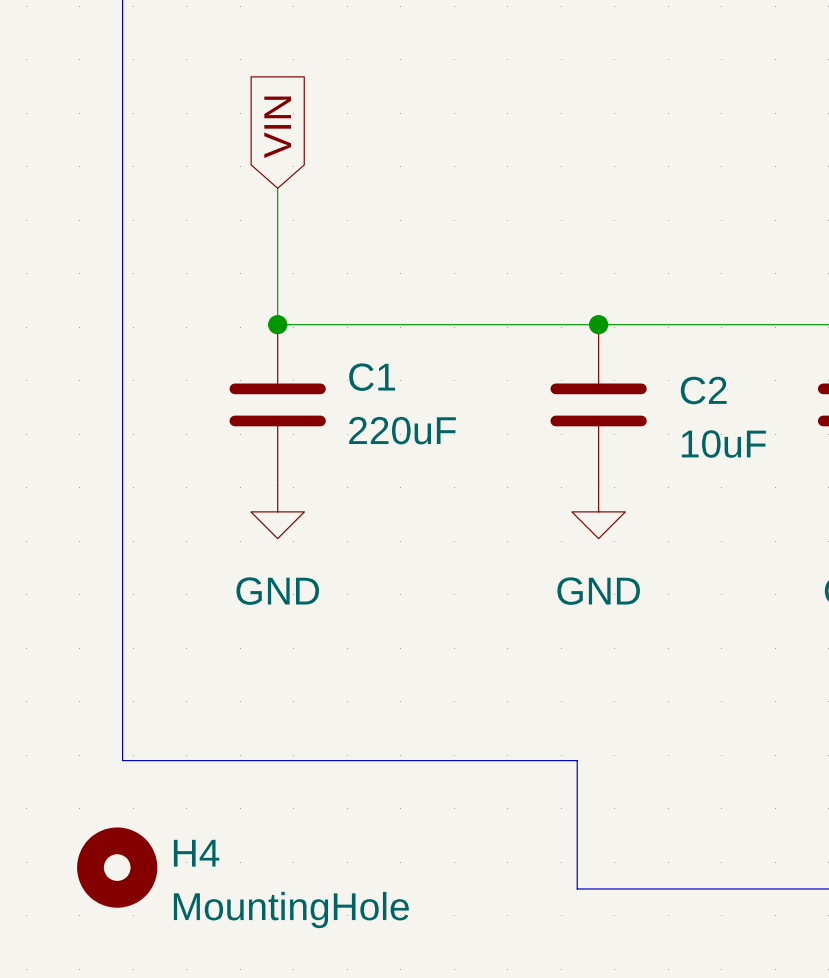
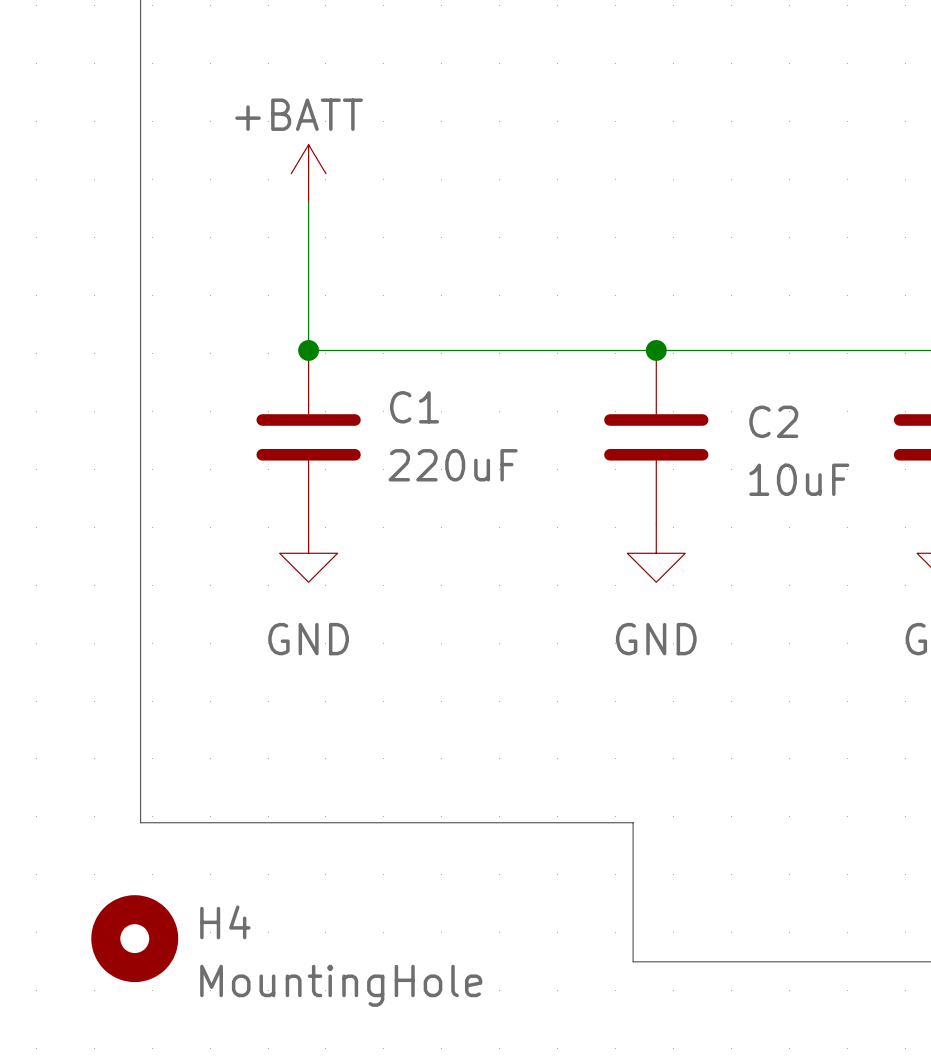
global label: VIN (277, 127) -> none
power symbol: none -> +BATT (308, 173)

